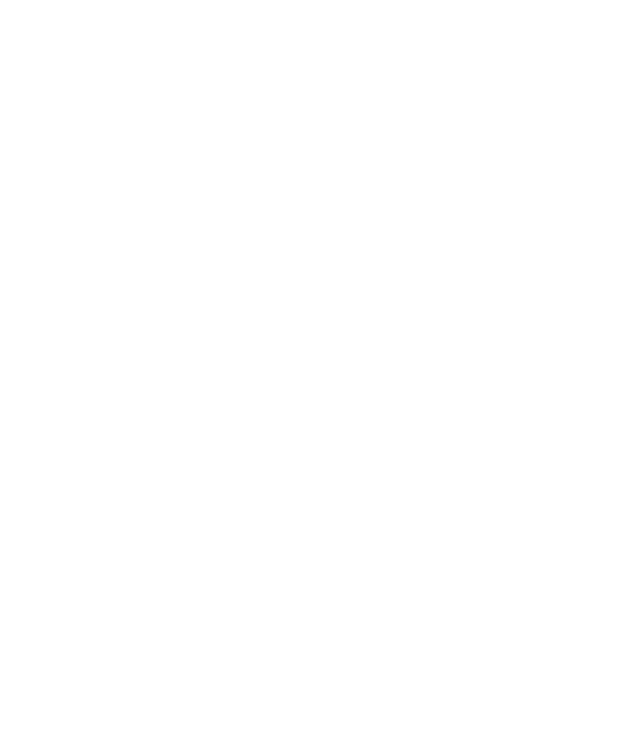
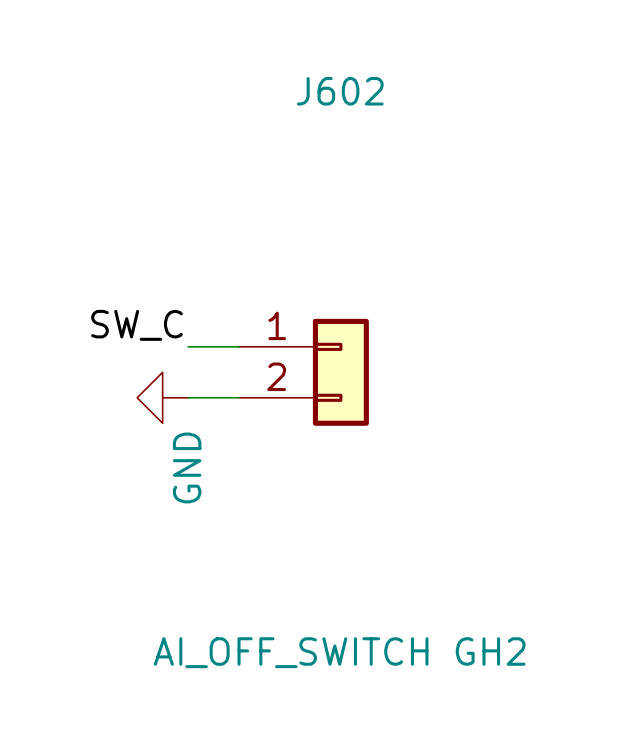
label: none -> SW_C (136, 325)
wire: none -> (188, 346) (239, 346)
J602: none -> AI_OFF_SWITCH GH2 (303, 372)
power symbol: none -> GND (162, 397)
wire: none -> (188, 397) (239, 397)

